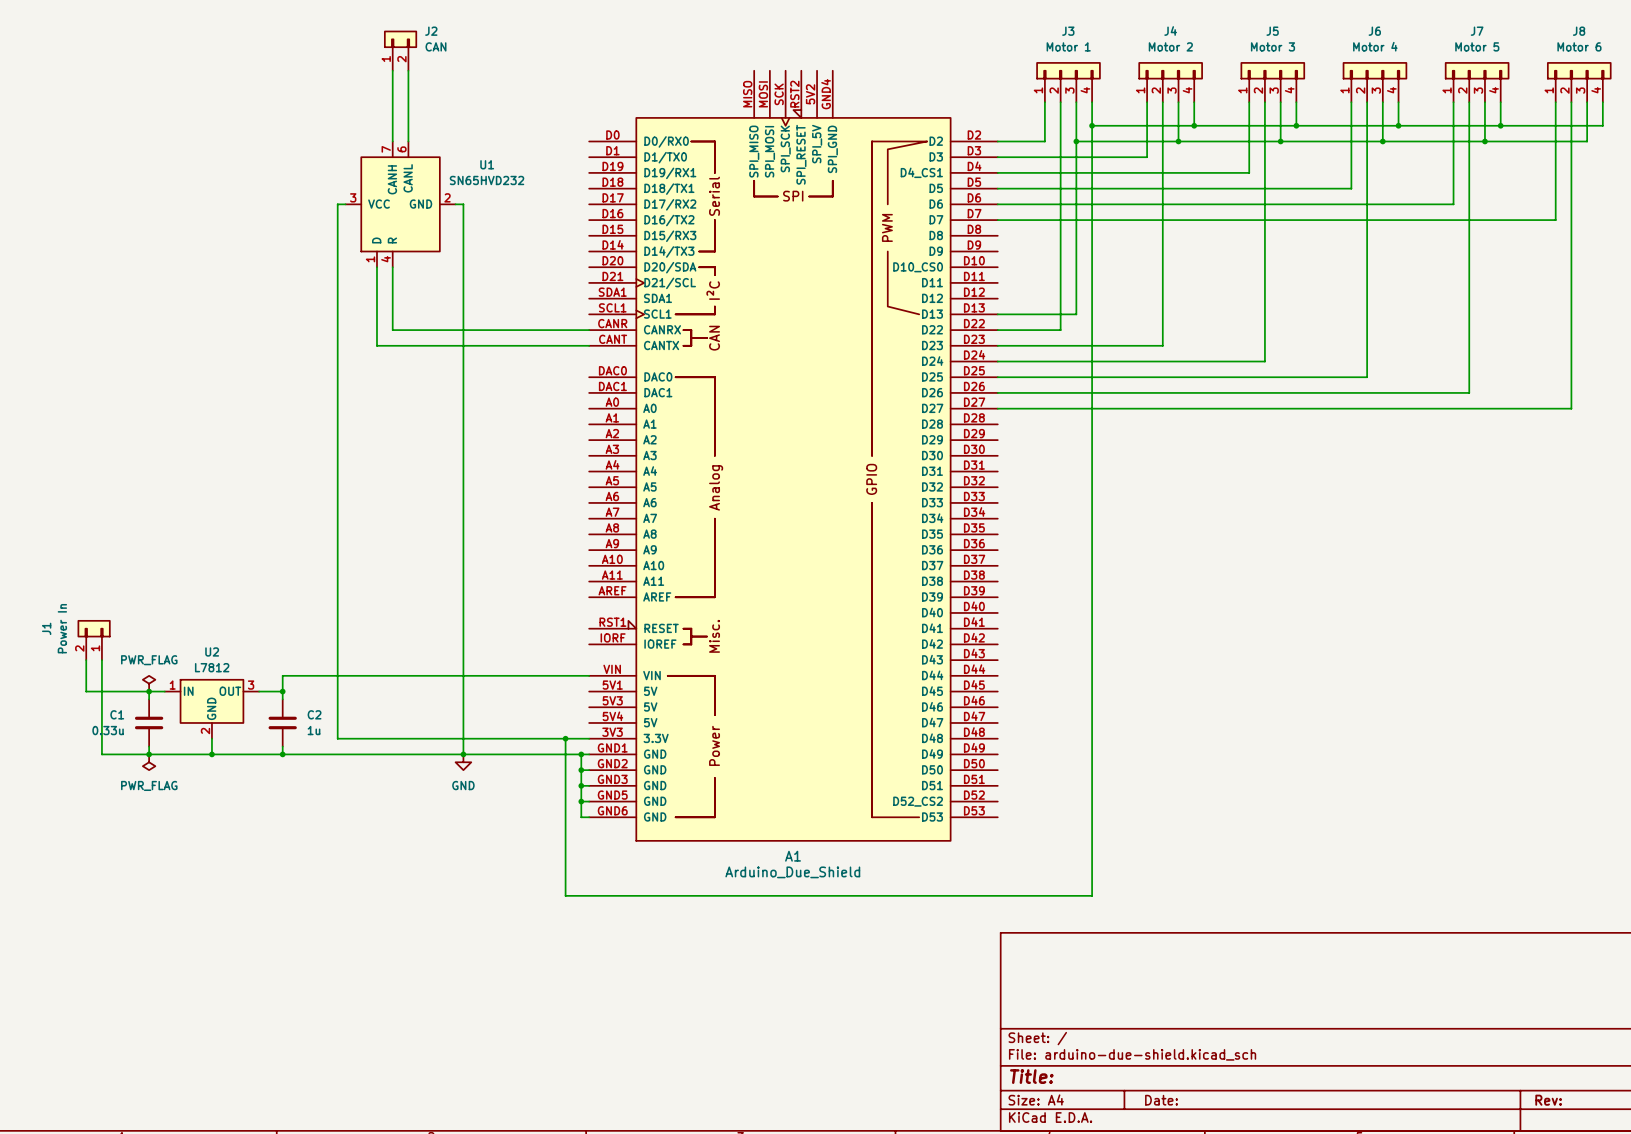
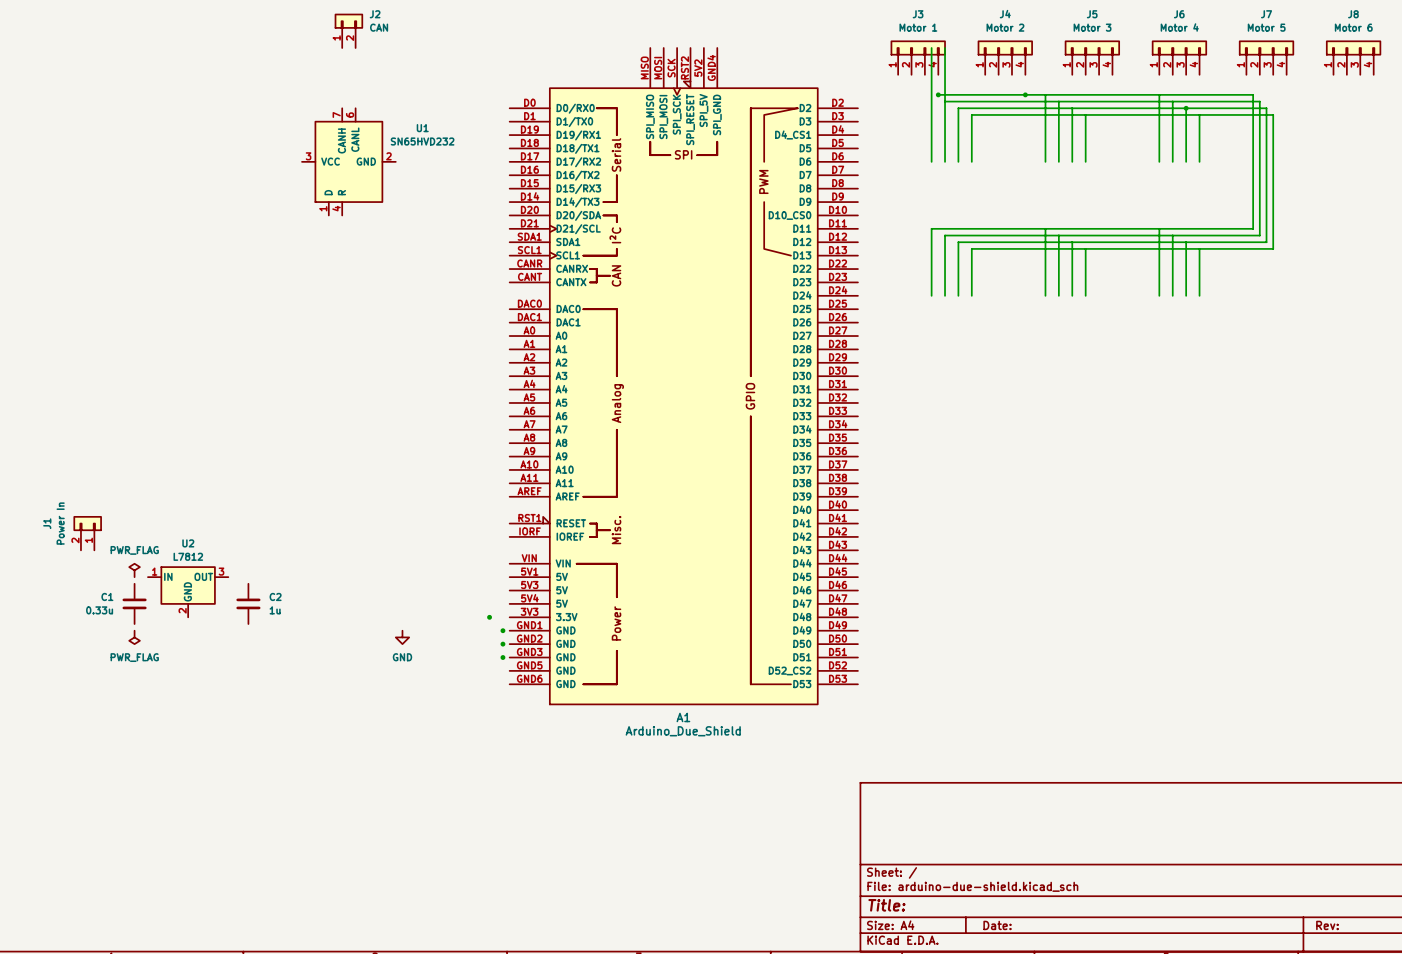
wire: (392, 70) (392, 141) -> none
wire: (408, 70) (408, 141) -> none
wire: none -> (931, 48) (931, 161)
wire: none -> (945, 48) (945, 161)
wire: (1044, 102) (1044, 141) (997, 141) -> none
wire: (1060, 102) (1060, 330) (997, 330) -> none
wire: (1076, 102) (1076, 314) (997, 314) -> none
wire: (1092, 102) (1092, 895) (565, 895) (565, 738) -> none
wire: (1147, 102) (1147, 157) (997, 157) -> none
wire: (1162, 102) (1162, 345) (997, 345) -> none
wire: (1178, 102) (1178, 141) -> none
wire: (1194, 102) (1194, 125) -> none
wire: (1249, 102) (1249, 141) -> none
wire: (1264, 102) (1264, 149) -> none
wire: (1280, 102) (1280, 141) -> none
wire: (1296, 102) (1296, 125) -> none
wire: (1351, 102) (1351, 125) -> none
wire: (1367, 102) (1367, 133) -> none
wire: (1382, 102) (1382, 141) -> (1186, 161) (1186, 108)
wire: (1398, 102) (1398, 125) -> none
wire: (1453, 102) (1453, 204) (997, 204) -> none
wire: (1469, 102) (1469, 133) -> (945, 101) (1259, 101)
wire: (1484, 102) (1484, 141) -> none
wire: (1500, 102) (1500, 125) -> none
wire: (1555, 102) (1555, 220) (997, 220) -> none
wire: (1571, 102) (1571, 408) (997, 408) -> none
wire: (1587, 102) (1587, 141) (1477, 141) -> (958, 295) (958, 242) (1266, 242) (1266, 108)
wire: (1602, 102) (1602, 125) (1461, 125) -> (931, 295) (931, 228) (1253, 228) (1253, 94)
wire: none -> (1045, 94) (1045, 161)
junction: (1296, 125) -> none
junction: (1398, 125) -> none
junction: (1500, 125) -> none
wire: none -> (1058, 101) (1058, 161)
wire: (1076, 141) (1115, 141) -> (958, 161) (958, 108)
junction: (1076, 141) -> none
junction: (1178, 141) -> none
junction: (1280, 141) -> none
junction: (1484, 141) -> none
wire: none -> (1199, 114) (1199, 161)
wire: (997, 172) (1249, 172) -> (1072, 161) (1072, 135)
wire: (997, 188) (1351, 188) -> (1159, 161) (1159, 148)
wire: (345, 204) (337, 204) (337, 738) (589, 738) -> none
wire: (455, 204) (463, 204) (463, 754) -> none
wire: none -> (971, 161) (971, 114) (1273, 114) (1273, 248) (971, 248) (971, 295)
wire: (1264, 204) (1264, 306) -> none
wire: (1367, 204) (1367, 290) -> none
wire: (376, 267) (376, 345) (589, 345) -> none
wire: (392, 267) (392, 330) (589, 330) -> none
wire: none -> (1045, 228) (1045, 295)
wire: none -> (1159, 228) (1159, 295)
wire: none -> (1058, 235) (1058, 295)
wire: (1469, 290) (1469, 392) (997, 392) -> (1259, 235) (945, 235) (945, 295)
wire: none -> (1072, 242) (1072, 295)
wire: none -> (1186, 242) (1186, 295)
wire: none -> (1199, 248) (1199, 295)
wire: (997, 361) (1264, 361) -> none
wire: (1367, 361) (1367, 377) (997, 377) -> none
wire: (86, 660) (86, 691) (164, 691) -> none
wire: (101, 660) (101, 754) (589, 754) -> none
wire: (589, 675) (282, 675) (282, 699) -> none
wire: (149, 691) (149, 699) -> none
junction: (149, 691) -> none
wire: (259, 691) (282, 691) -> none
junction: (282, 691) -> none
wire: (211, 738) (211, 754) -> none
wire: (149, 746) (149, 754) -> none
wire: (282, 746) (282, 754) -> none
junction: (149, 754) -> none
junction: (211, 754) -> none
junction: (282, 754) -> none
junction: (463, 754) -> none
wire: (581, 754) (581, 817) (589, 817) -> none
wire: (581, 770) (589, 770) -> none
wire: (581, 785) (589, 785) -> none
wire: (581, 801) (589, 801) -> none
junction: (581, 801) -> none

